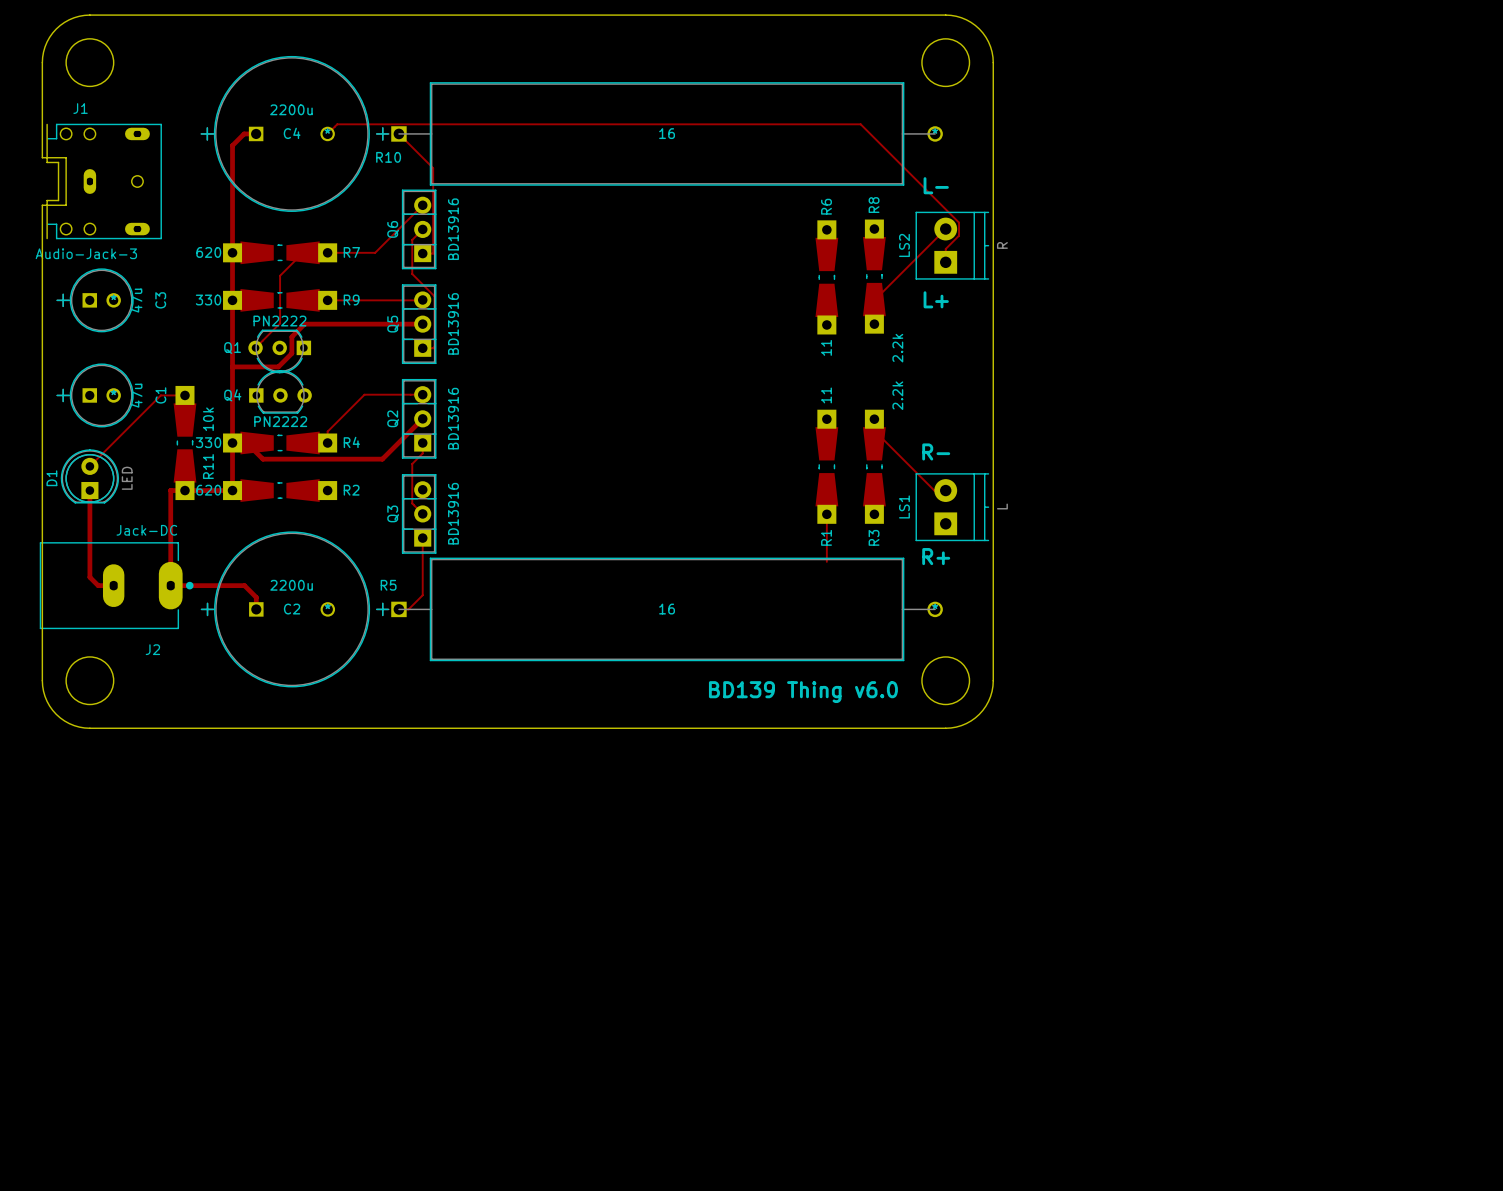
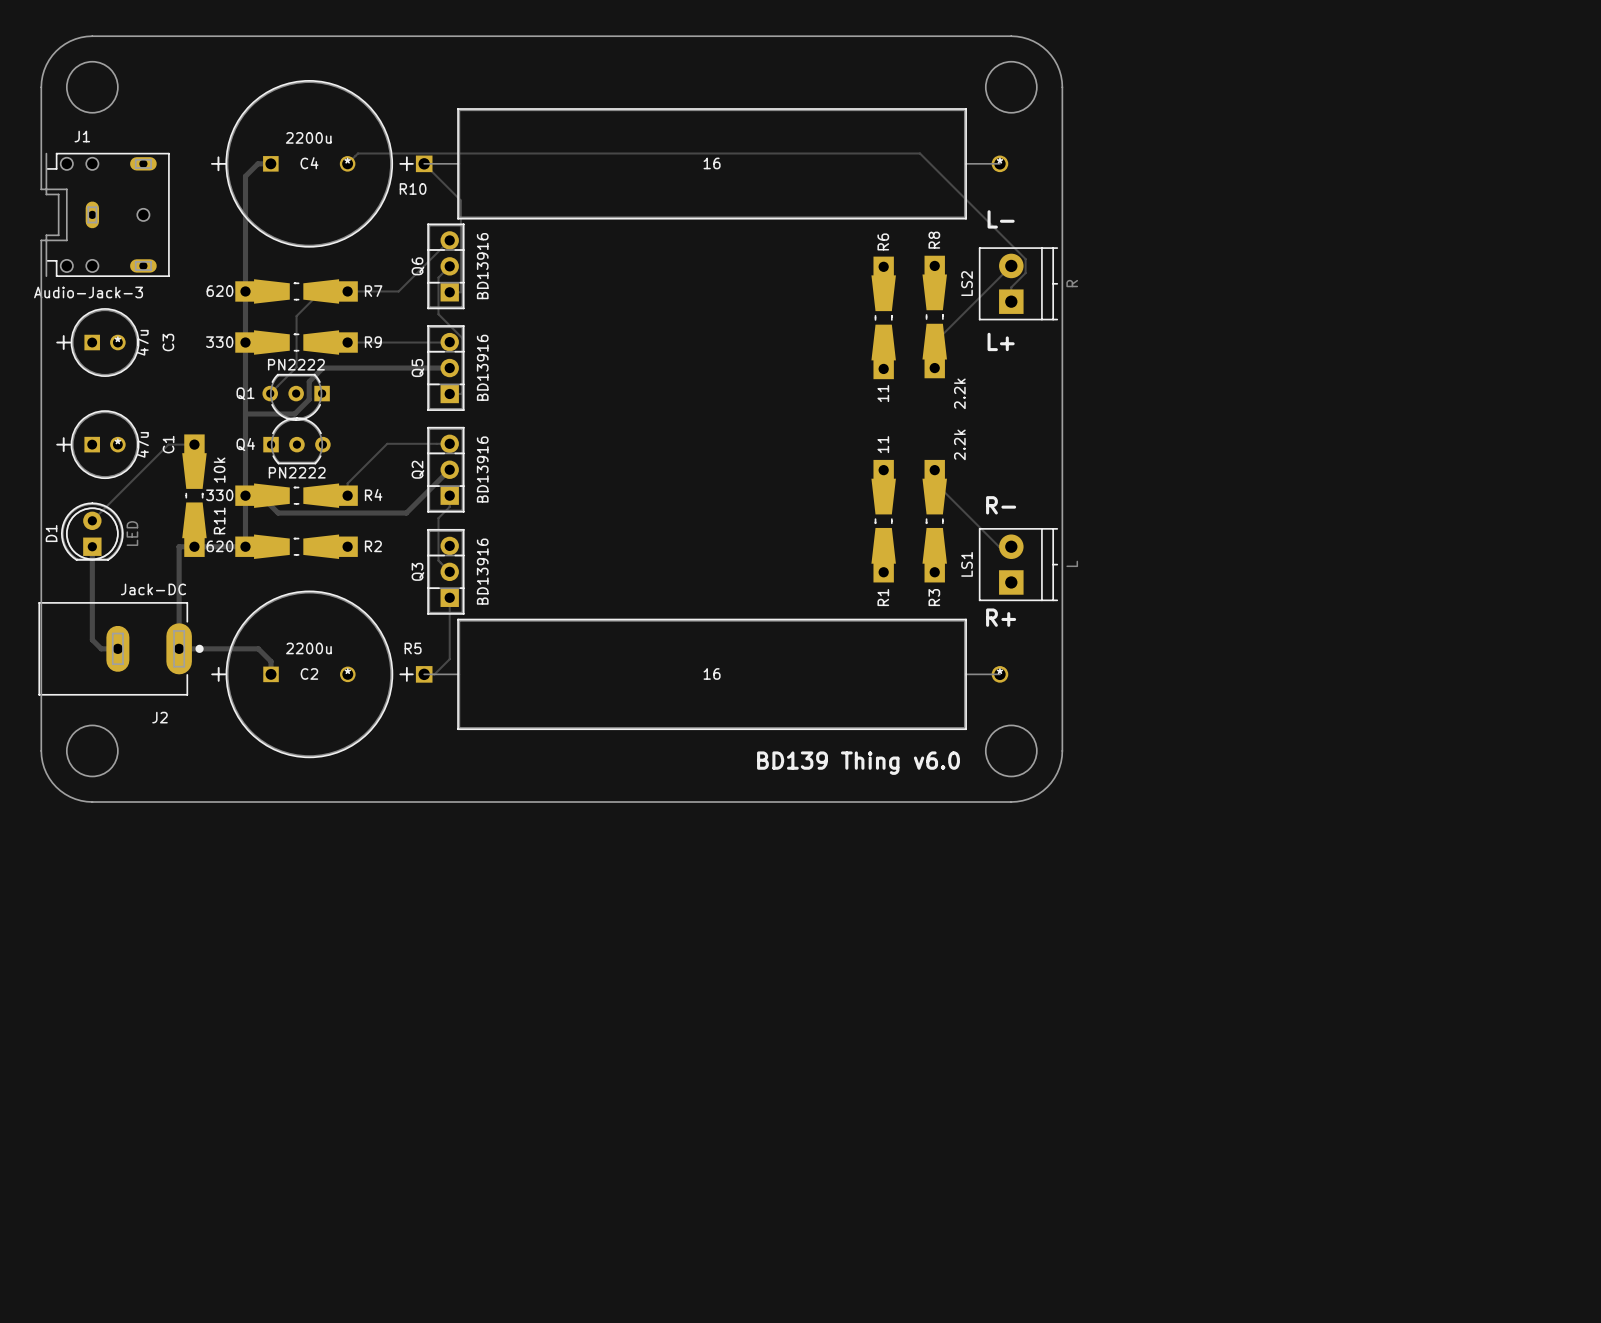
track: (826, 514) (826, 561) -> none

